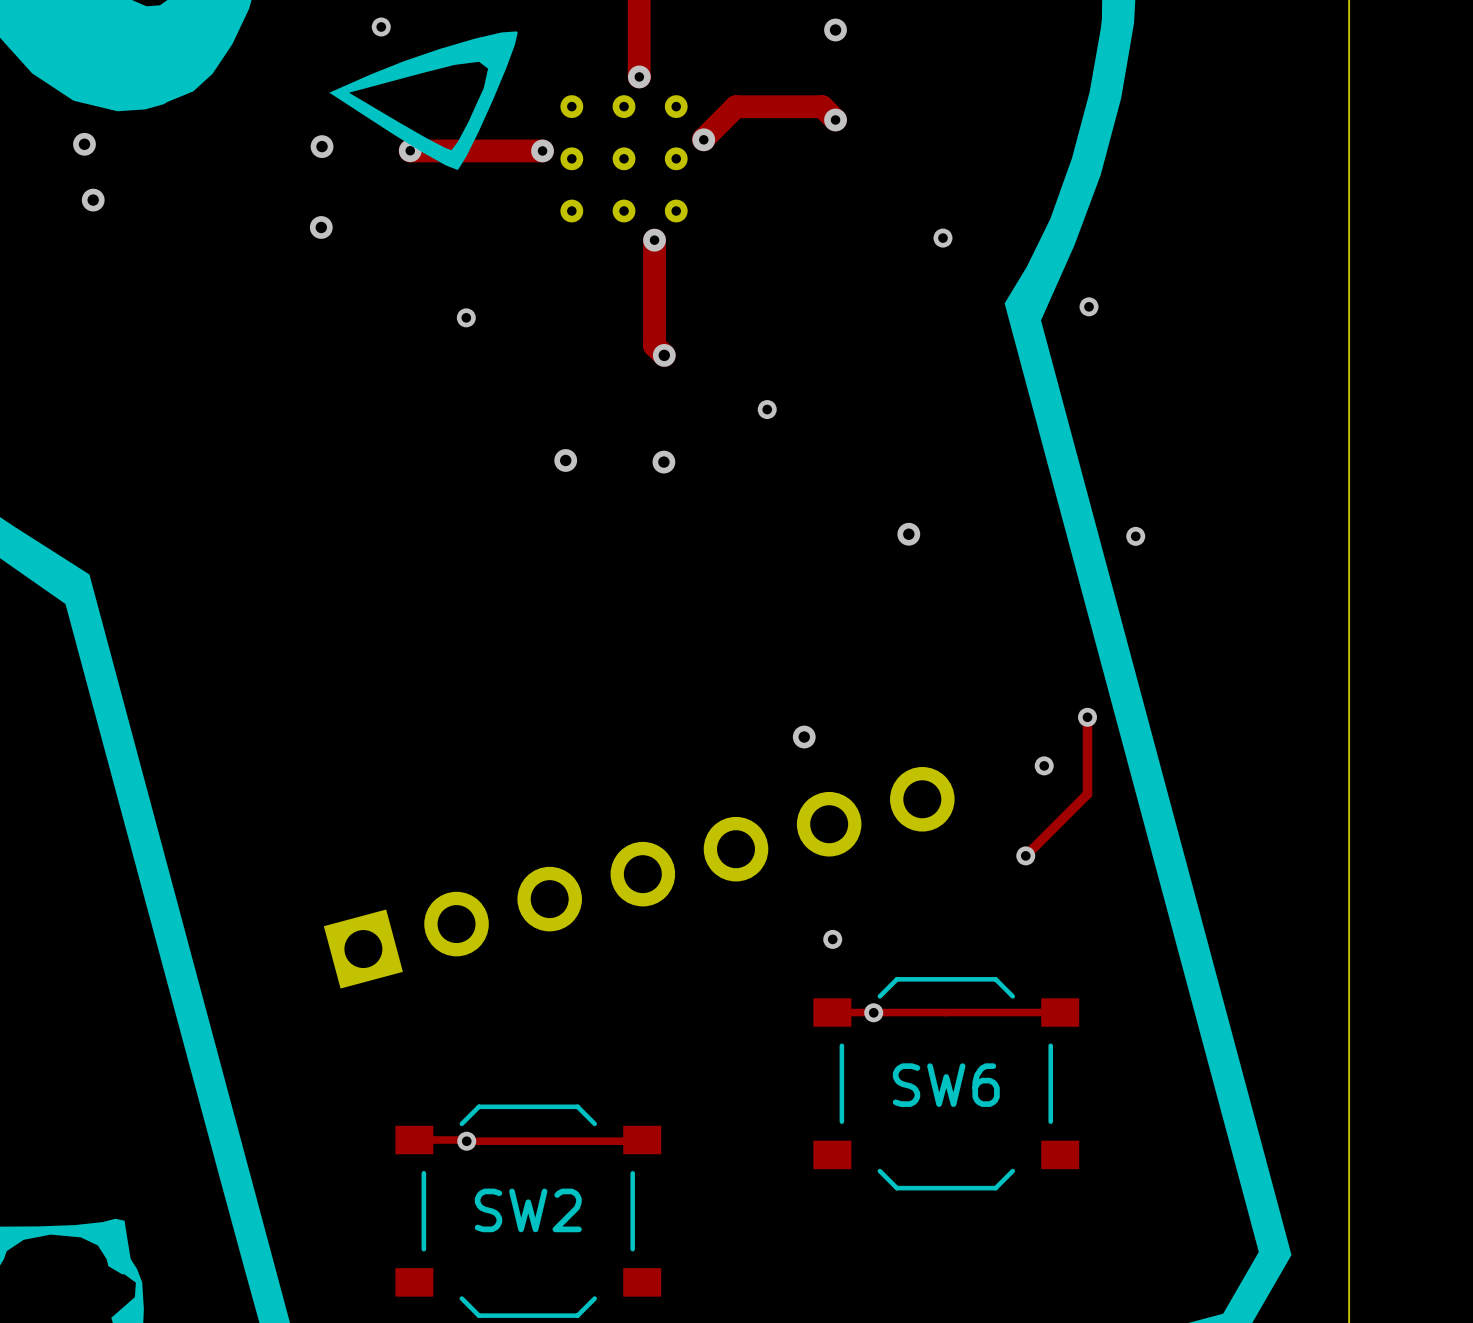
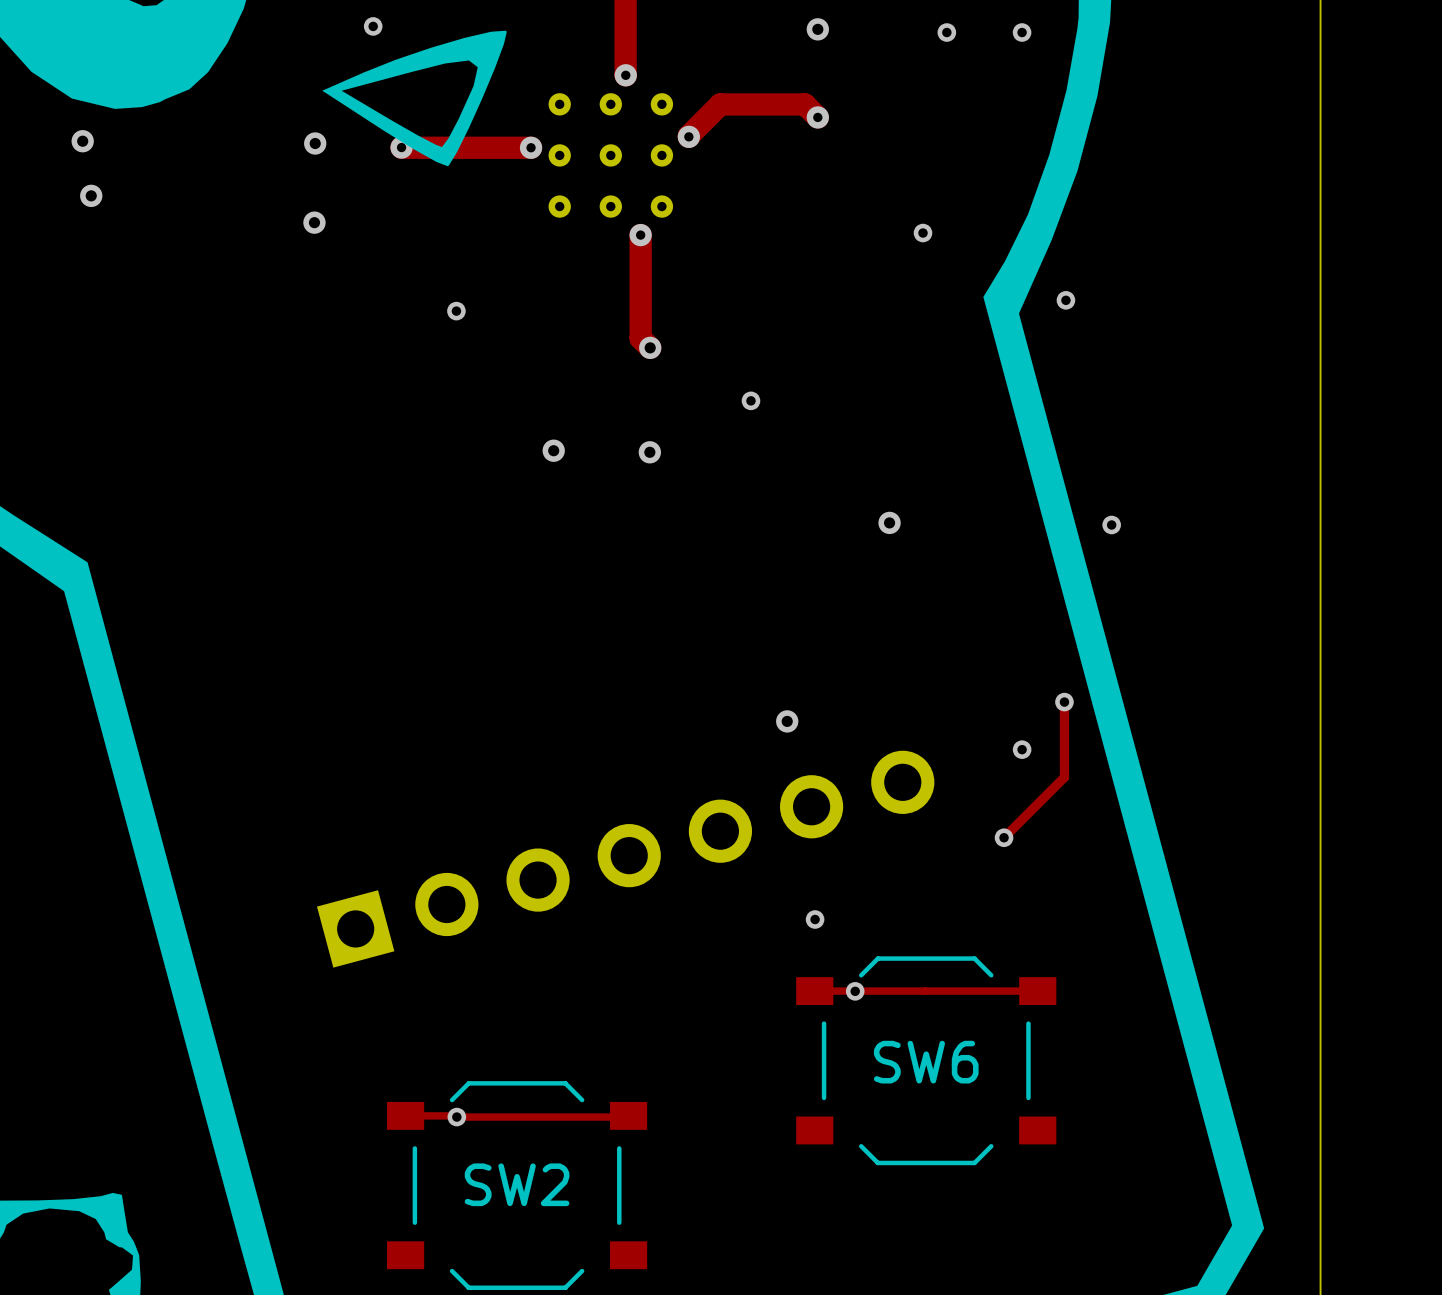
via: none -> (946, 32)
via: none -> (1022, 32)

